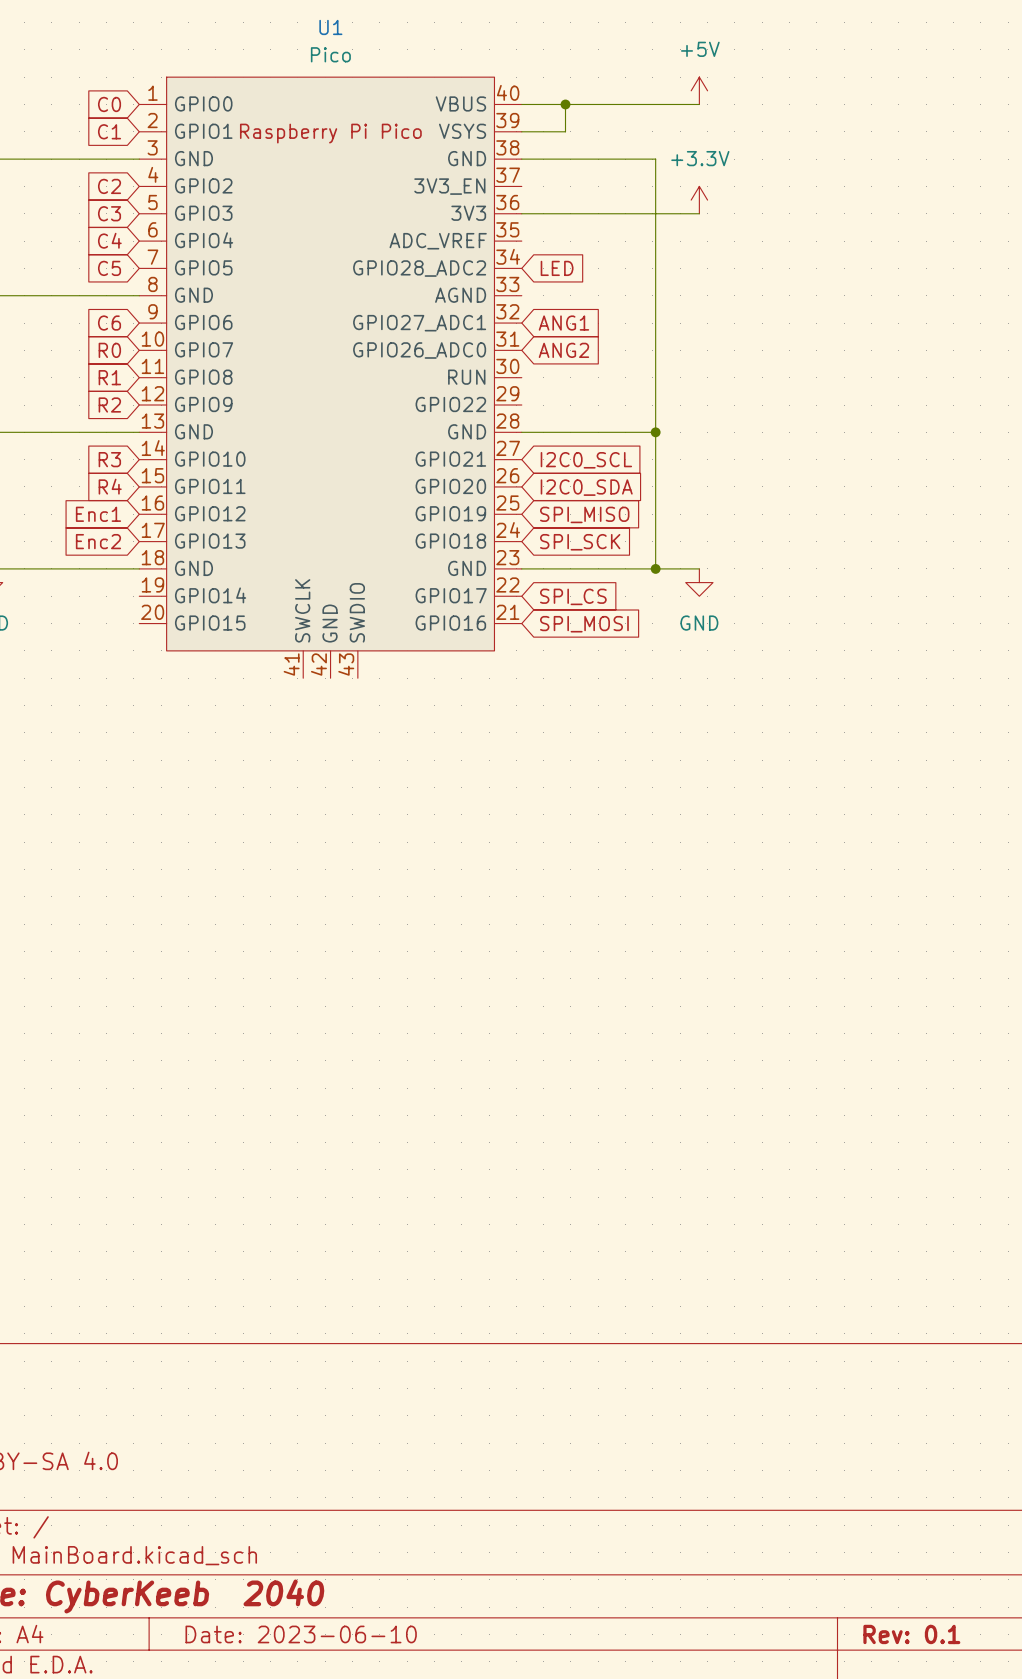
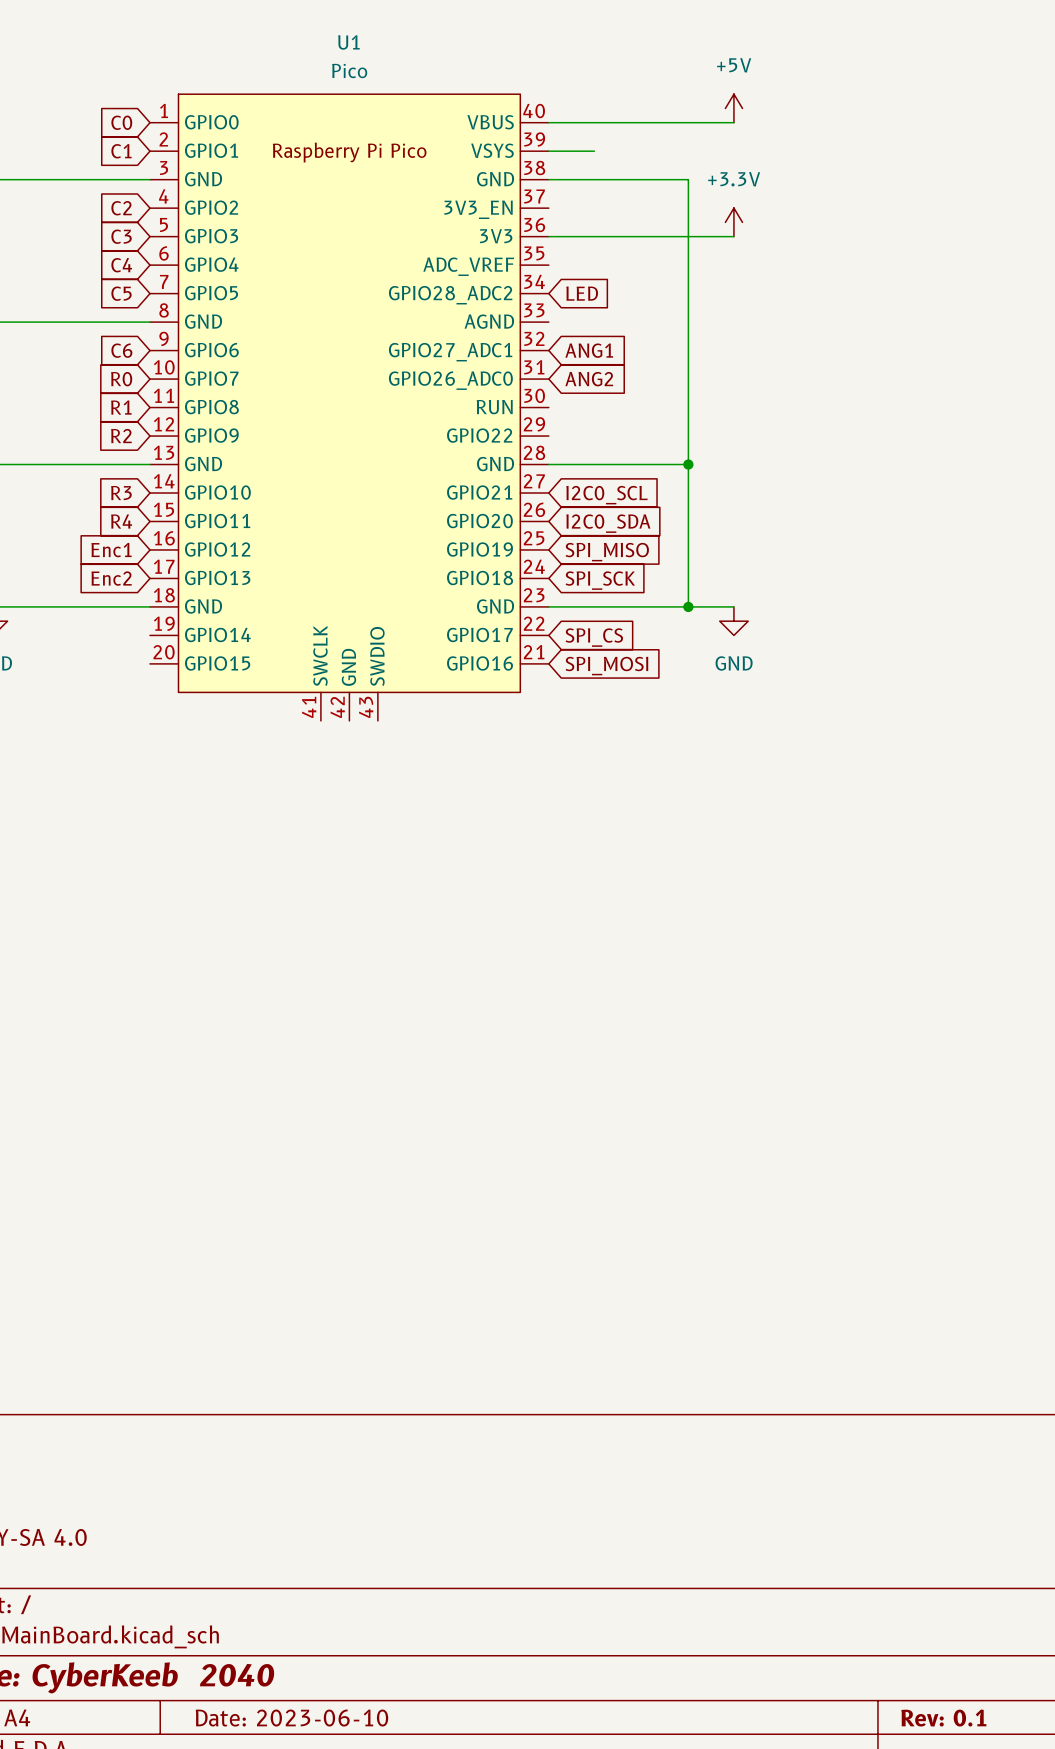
wire: (565, 104) (565, 131) -> none
junction: (565, 104) -> none

